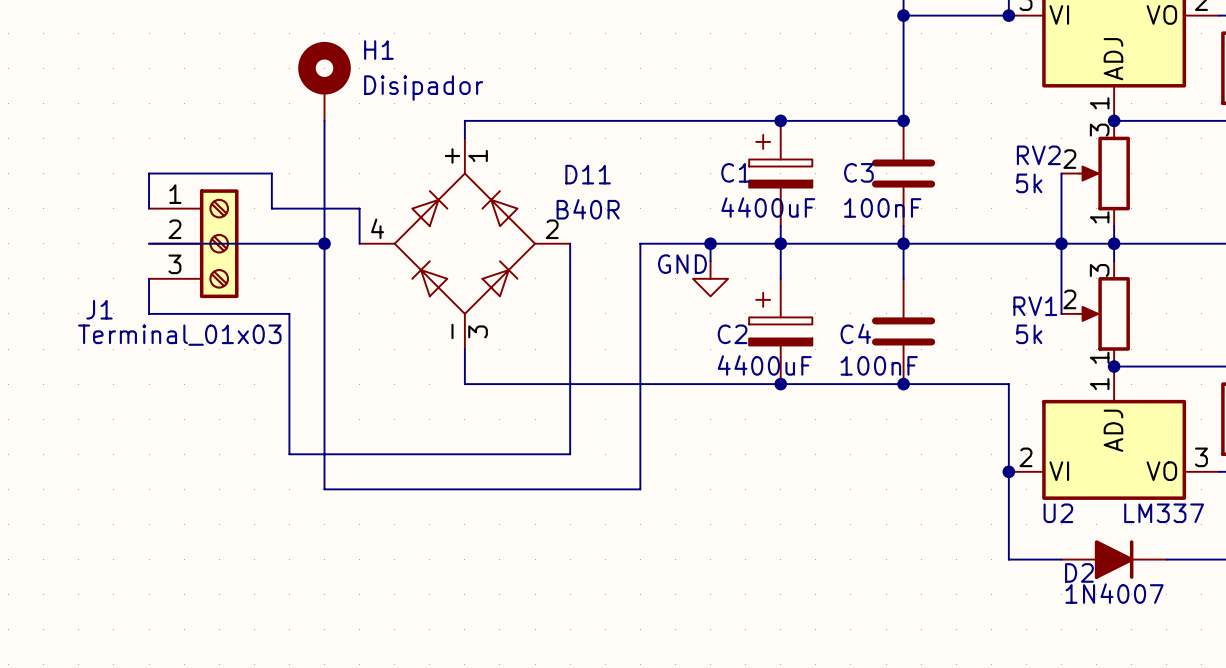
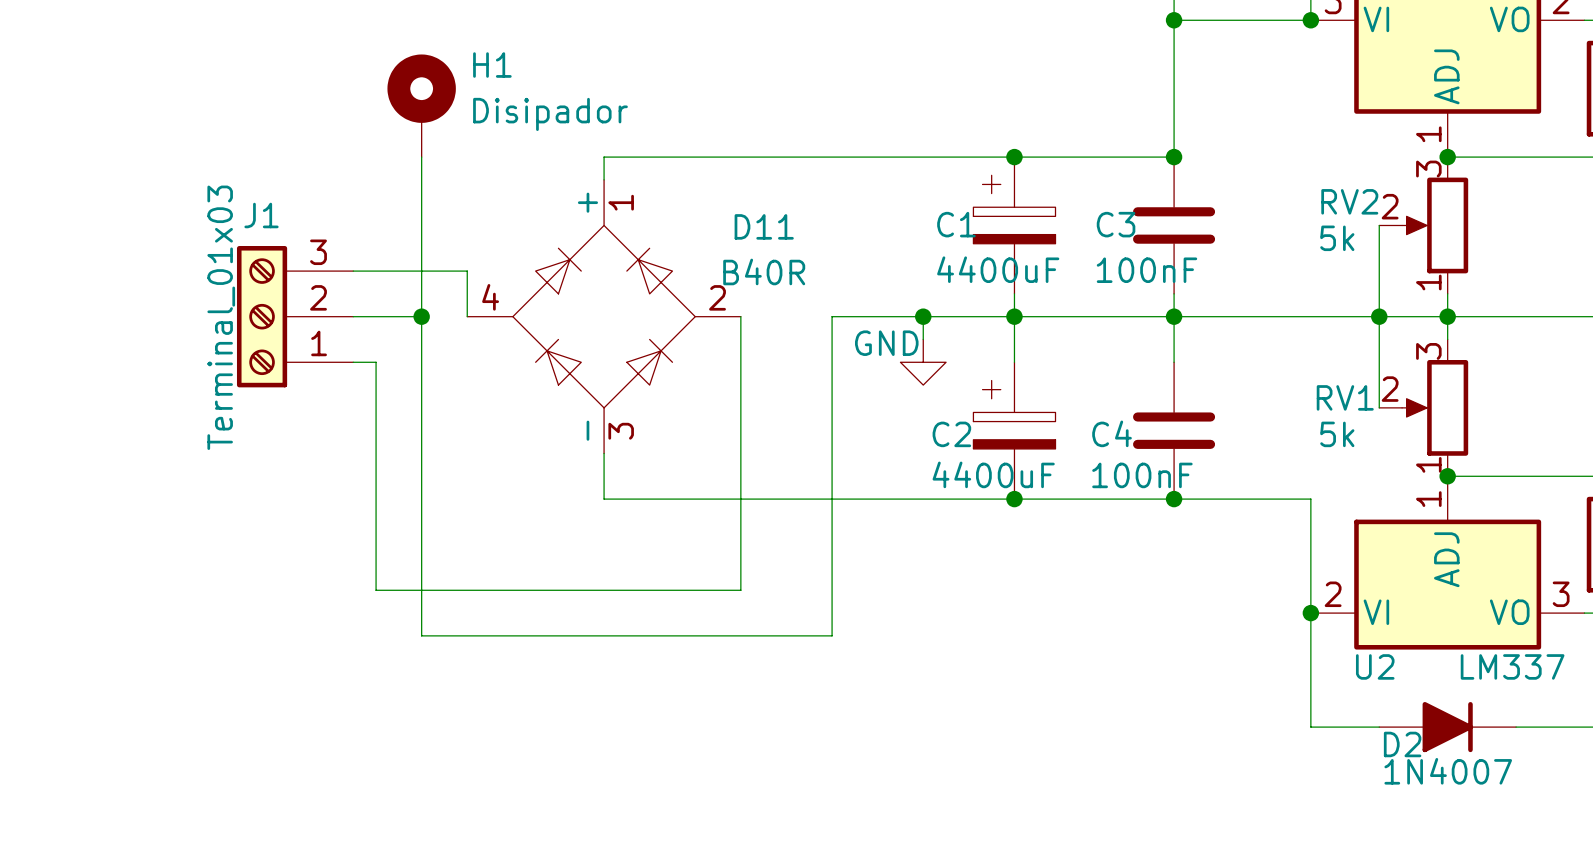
wire: (149, 208) (149, 173) (271, 173) (271, 208) -> none
J1 rotation: 0° (219, 243) -> 180° (262, 316)
wire: (149, 278) (149, 313) (289, 313) -> (353, 362) (376, 362) (376, 407)
J1 name position: J1 (99, 309) -> J1 (261, 215)
J1 value position: Terminal_01x03 (179, 335) -> Terminal_01x03 (221, 317)

